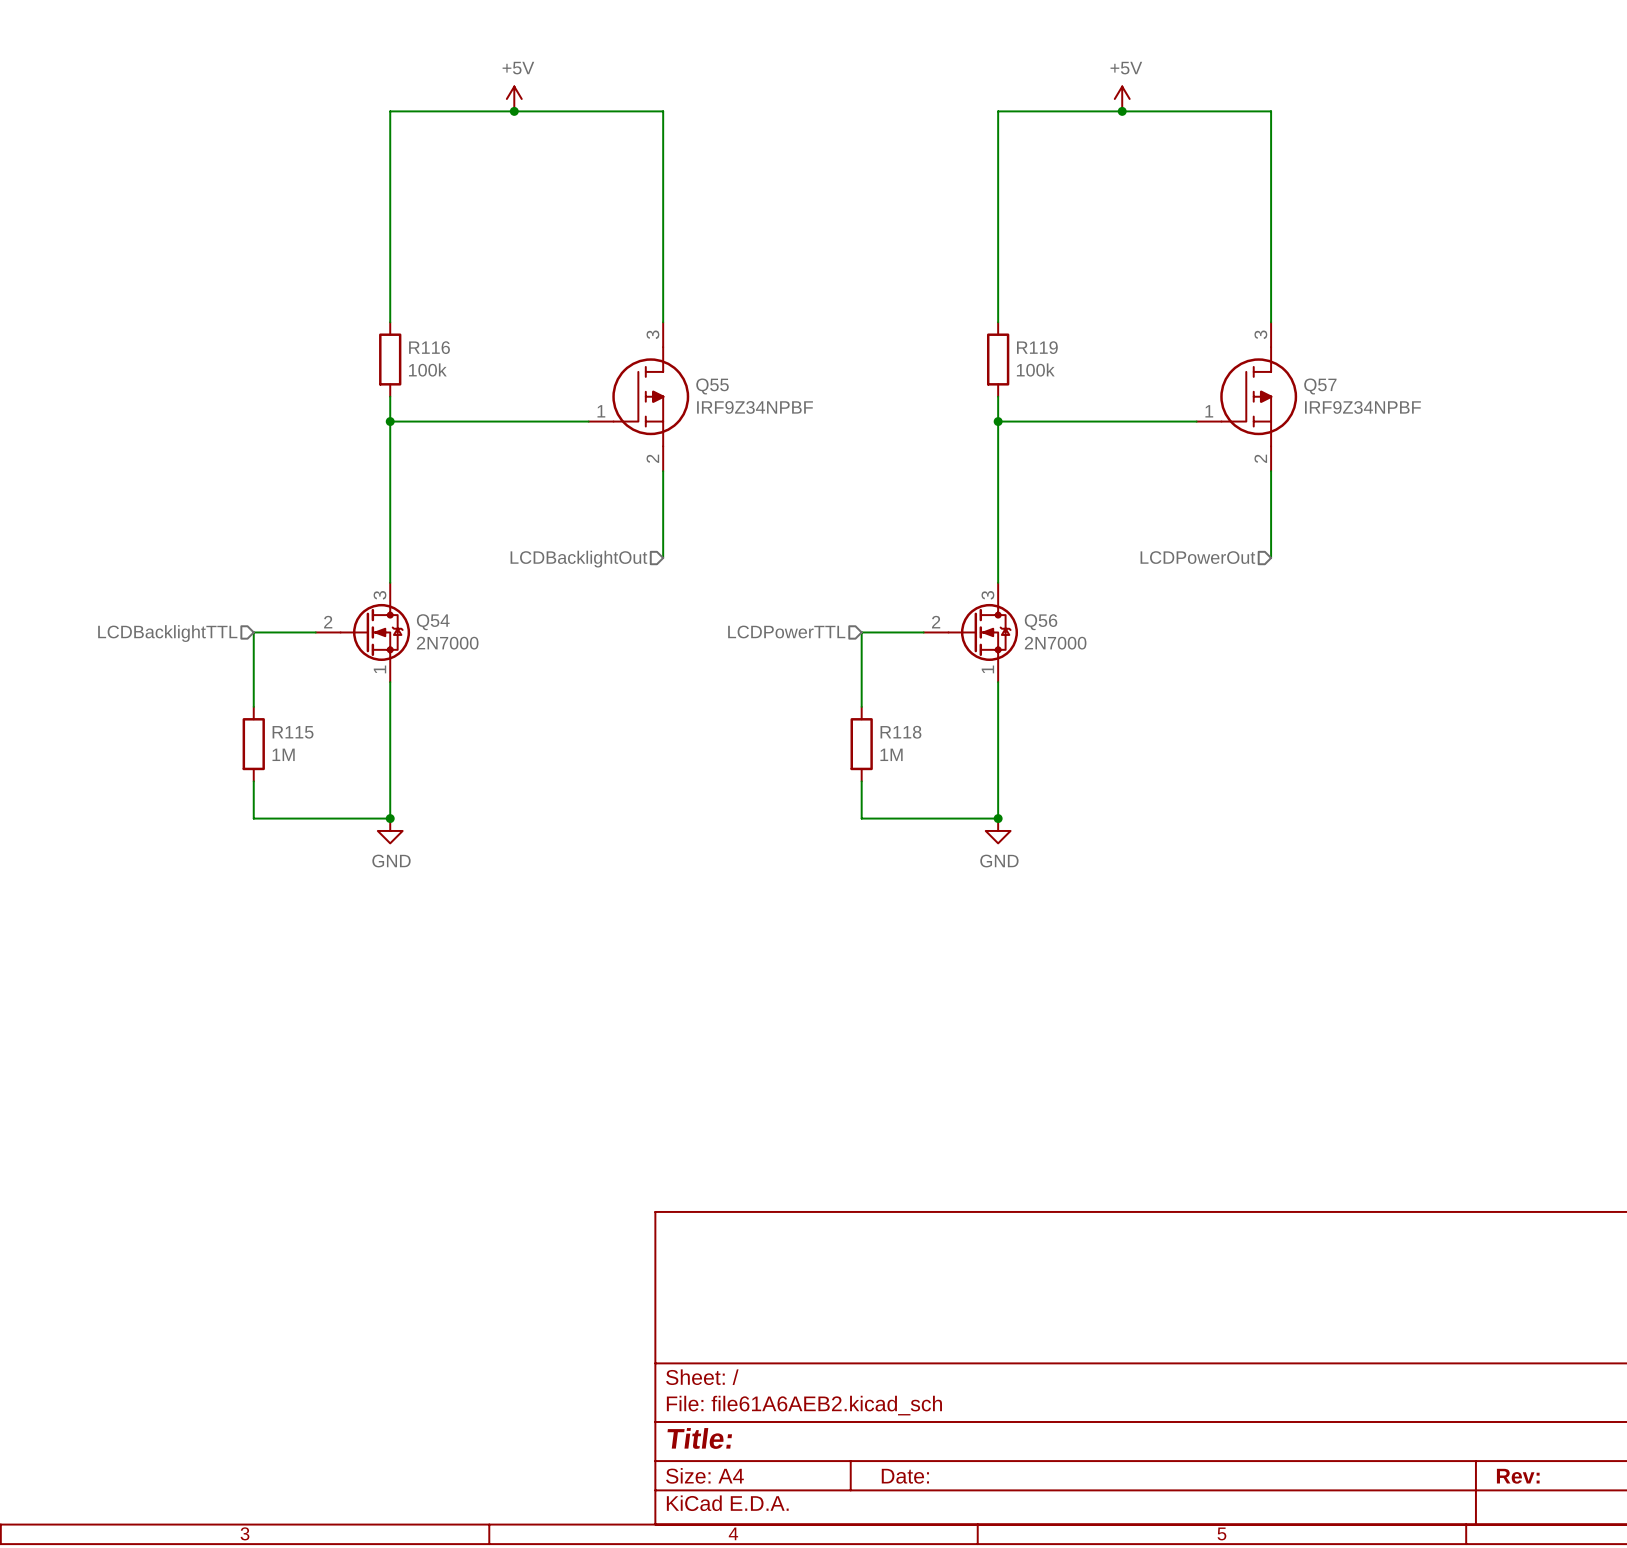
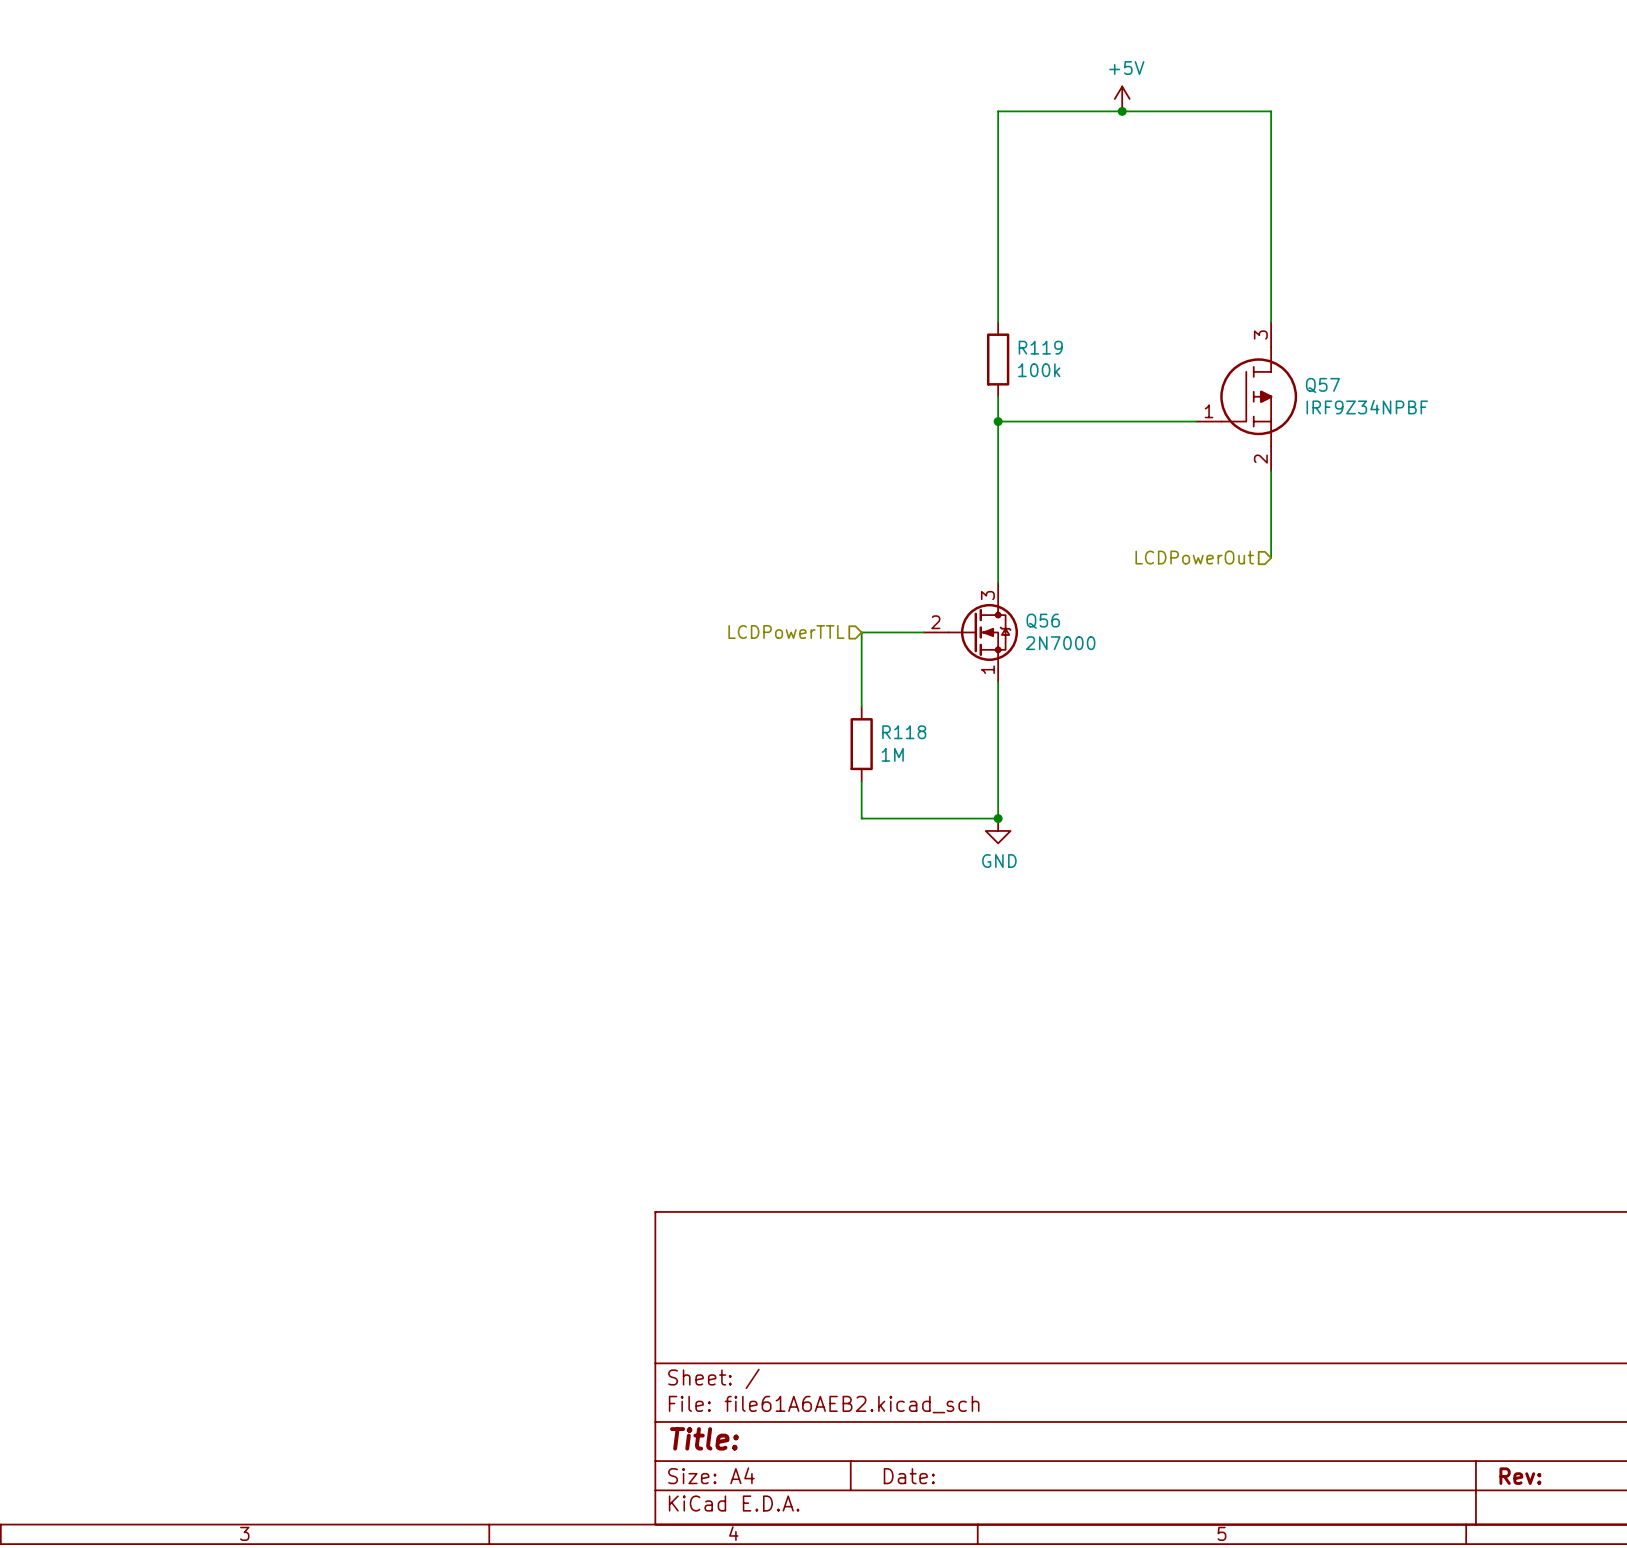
power symbol: +5V (514, 98) -> none
junction: (514, 111) -> none
wire: (390, 322) (390, 111) (663, 111) (663, 322) -> none
R116: 100k (390, 359) -> none
wire: (390, 396) (390, 582) -> none
Q55: IRF9Z34NPBF (638, 396) -> none
wire: (390, 421) (588, 421) -> none
junction: (390, 421) -> none
wire: (663, 471) (663, 558) -> none
hierarchical label: LCDBacklightOut (578, 559) -> none
wire: (315, 632) (253, 632) (253, 706) -> none
Q54: 2N7000 (362, 632) -> none
hierarchical label: LCDBacklightTTL (167, 633) -> none
wire: (390, 682) (390, 818) (253, 818) (253, 781) -> none
R115: 1M (253, 744) -> none
junction: (390, 818) -> none
power symbol: GND (390, 830) -> none

